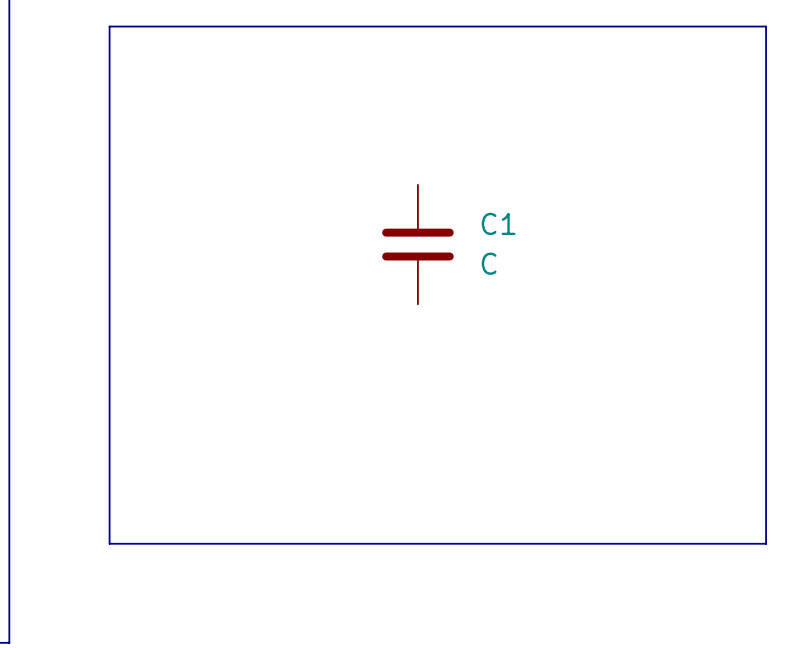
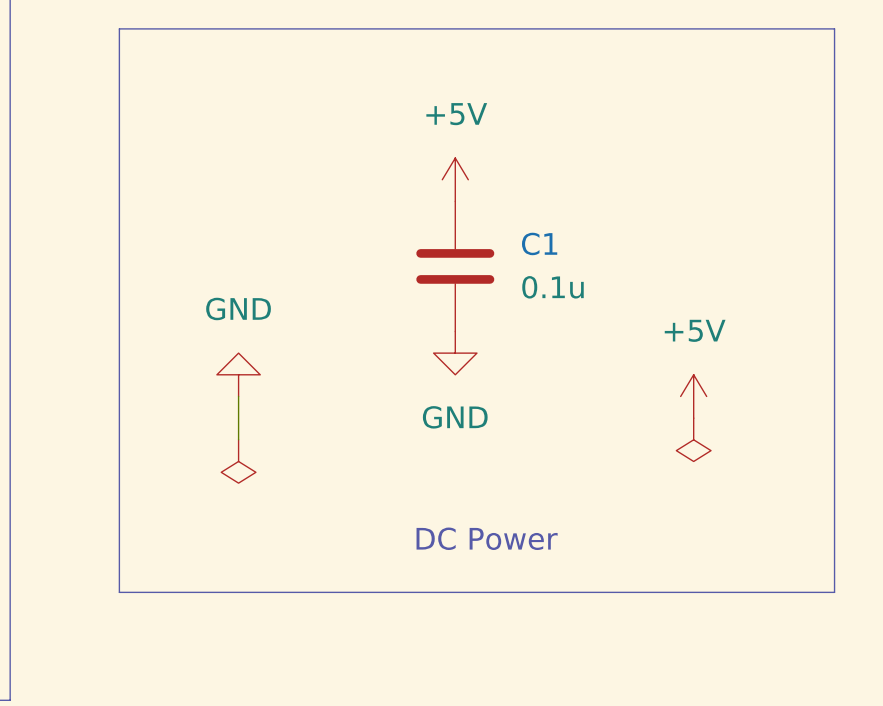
power symbol: none -> +5V (455, 179)
C1 value: C (489, 263) -> 0.1u (552, 287)
power symbol: none -> GND (455, 353)
power symbol: none -> GND (238, 374)
wire: none -> (238, 396) (238, 439)
power symbol: none -> +5V (693, 396)
power symbol: none -> (693, 439)
power symbol: none -> (238, 461)
text: none -> DC Power (487, 538)

